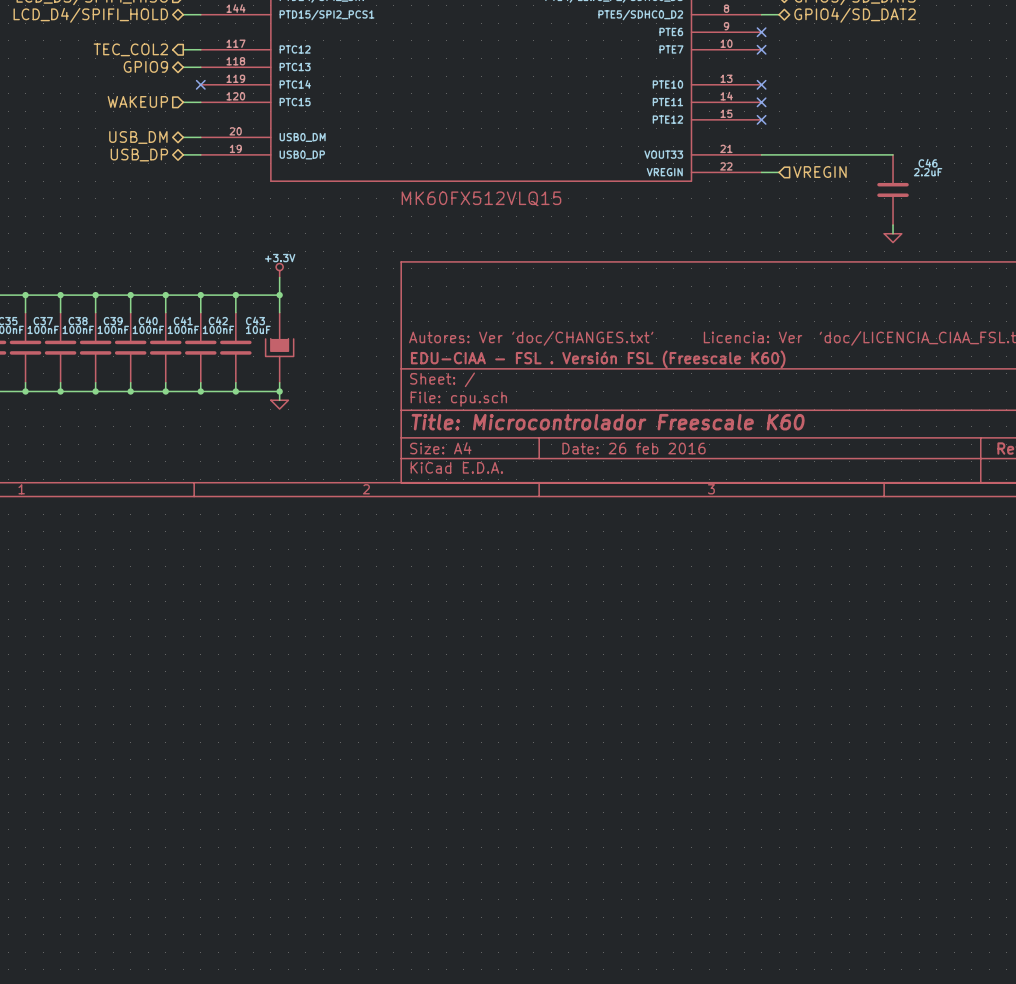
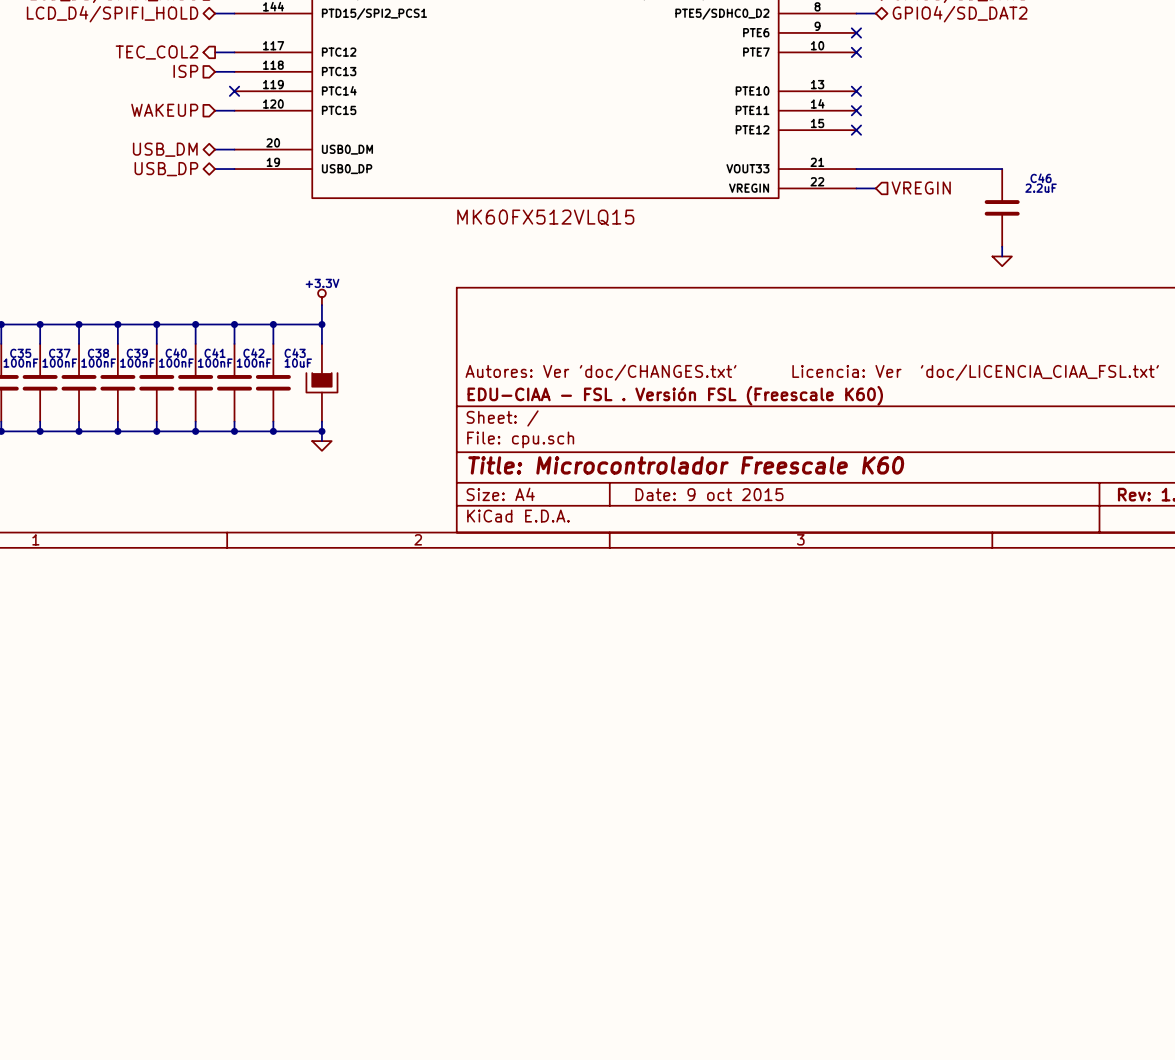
hierarchical label shape: bidirectional (145, 66) -> input (185, 71)
hierarchical label: GPIO9 (145, 66) -> ISP (185, 71)
title block: Date: 26 feb 2016 (634, 448) -> Date: 9 oct 2015 (709, 494)

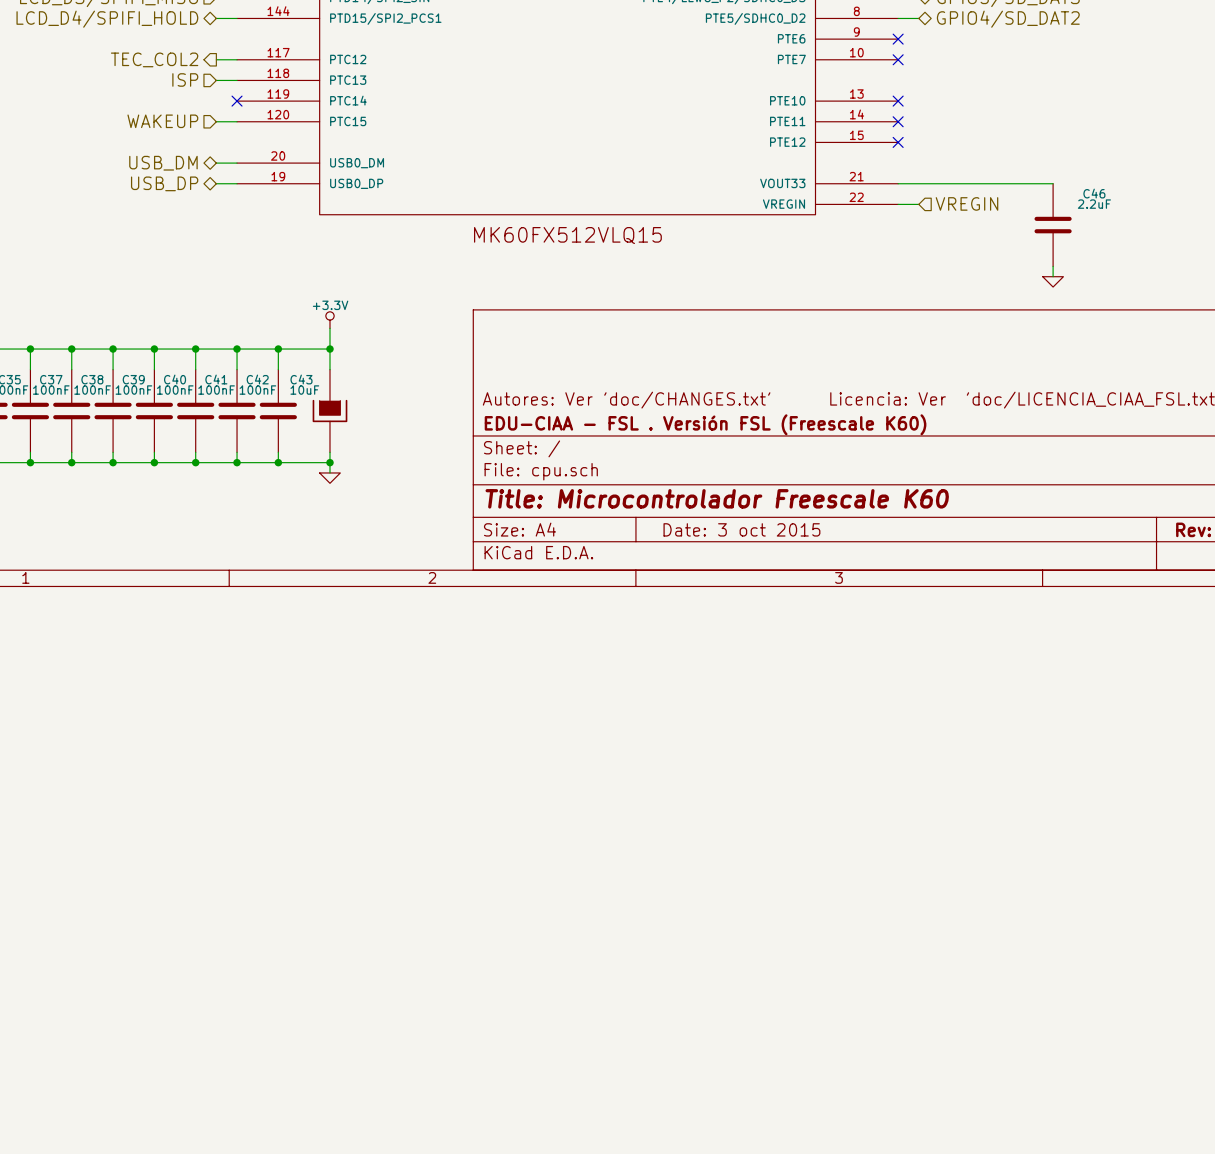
title block: Date: 9 oct 2015 (709, 494) -> Date: 3 oct 2015 (741, 529)

